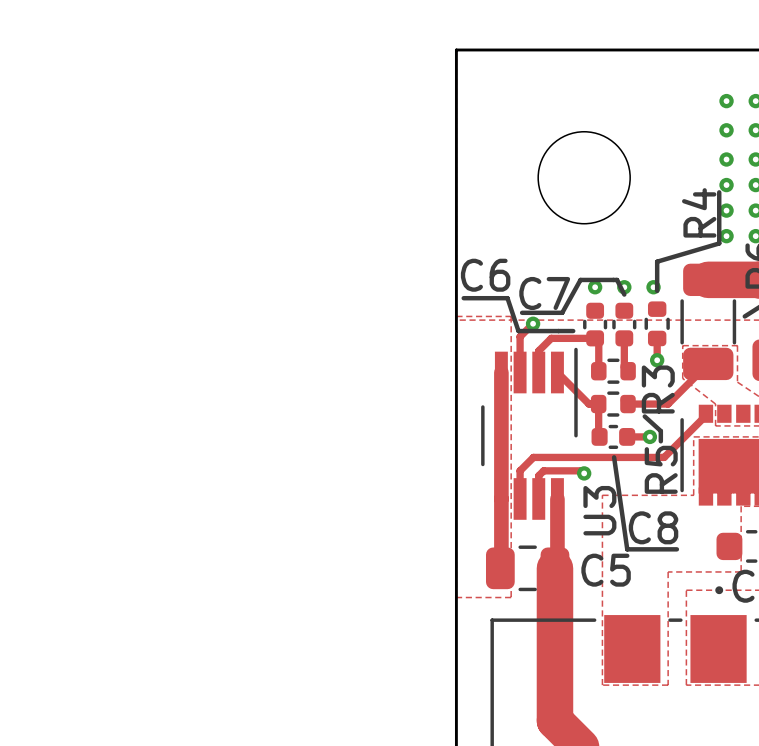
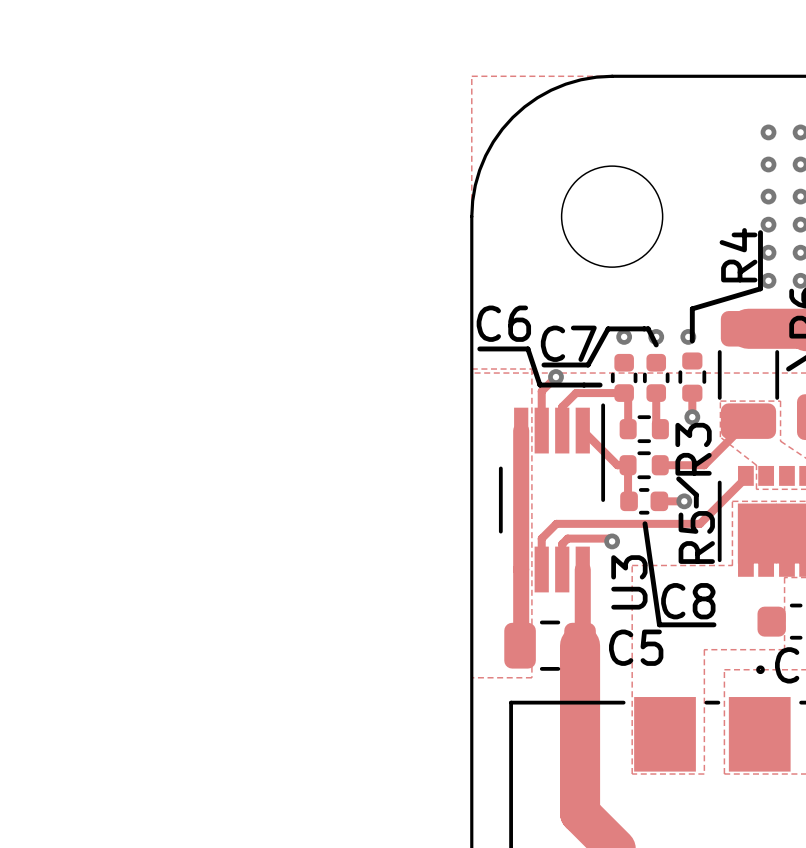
board edge: (584, 49) (456, 49) (456, 177) -> (612, 76) (596, 77) (565, 84) (537, 97) (512, 117) (493, 141) (479, 170) (472, 200) (471, 216)

